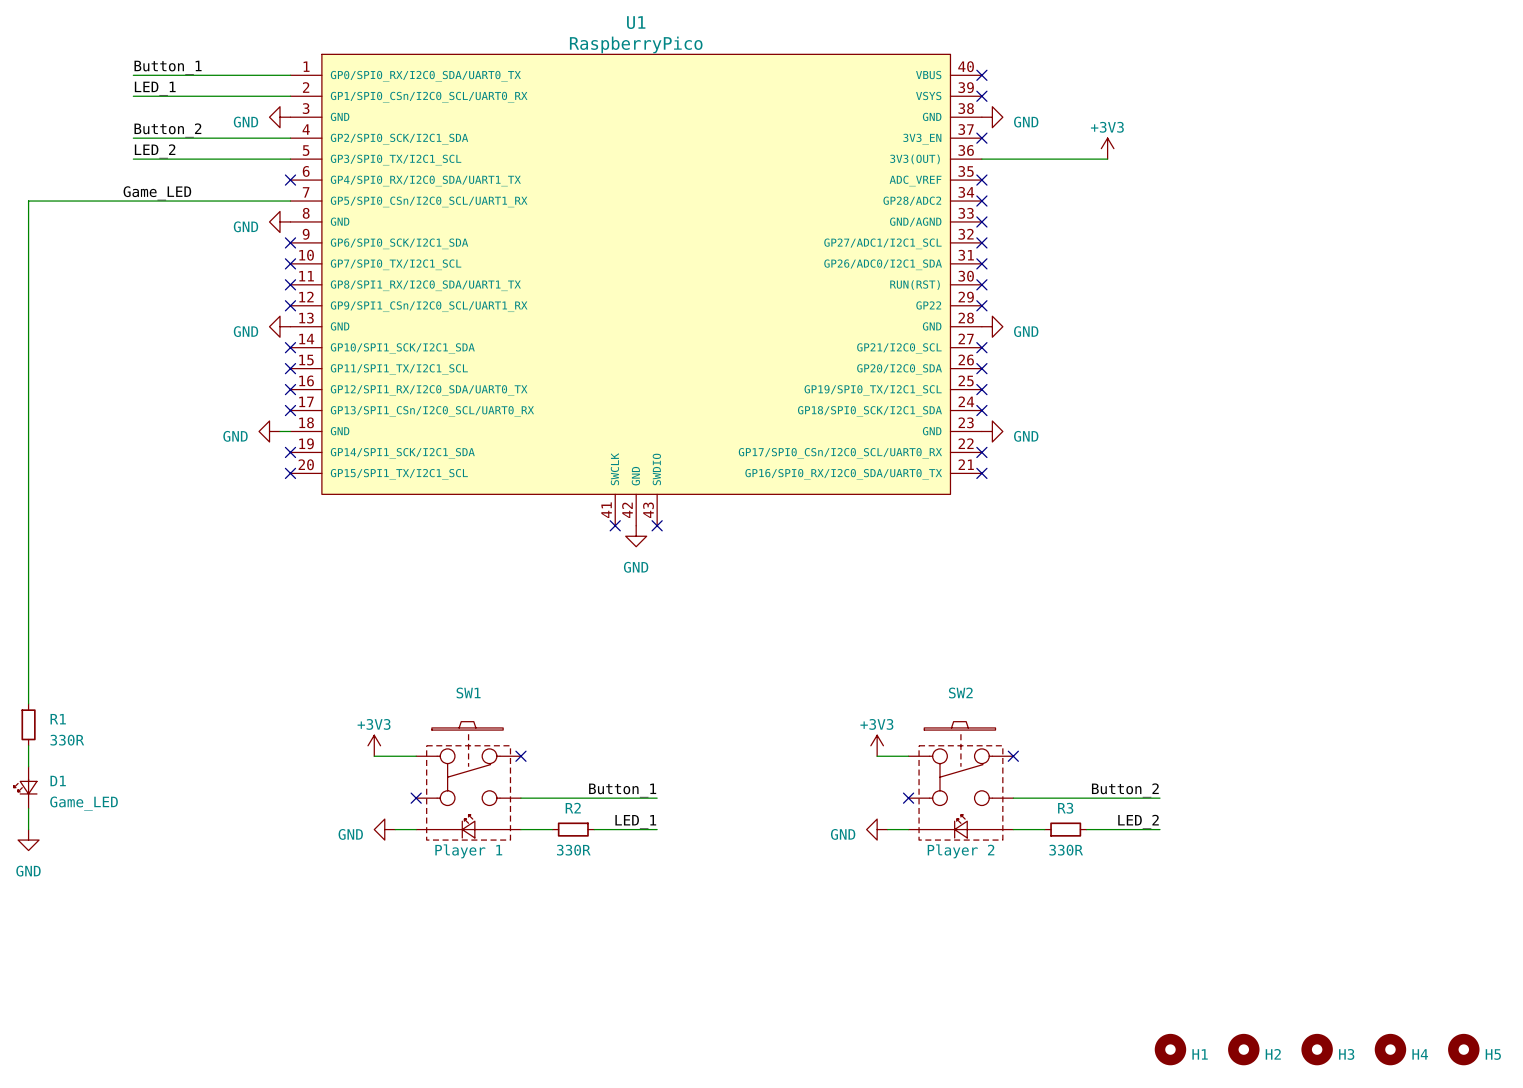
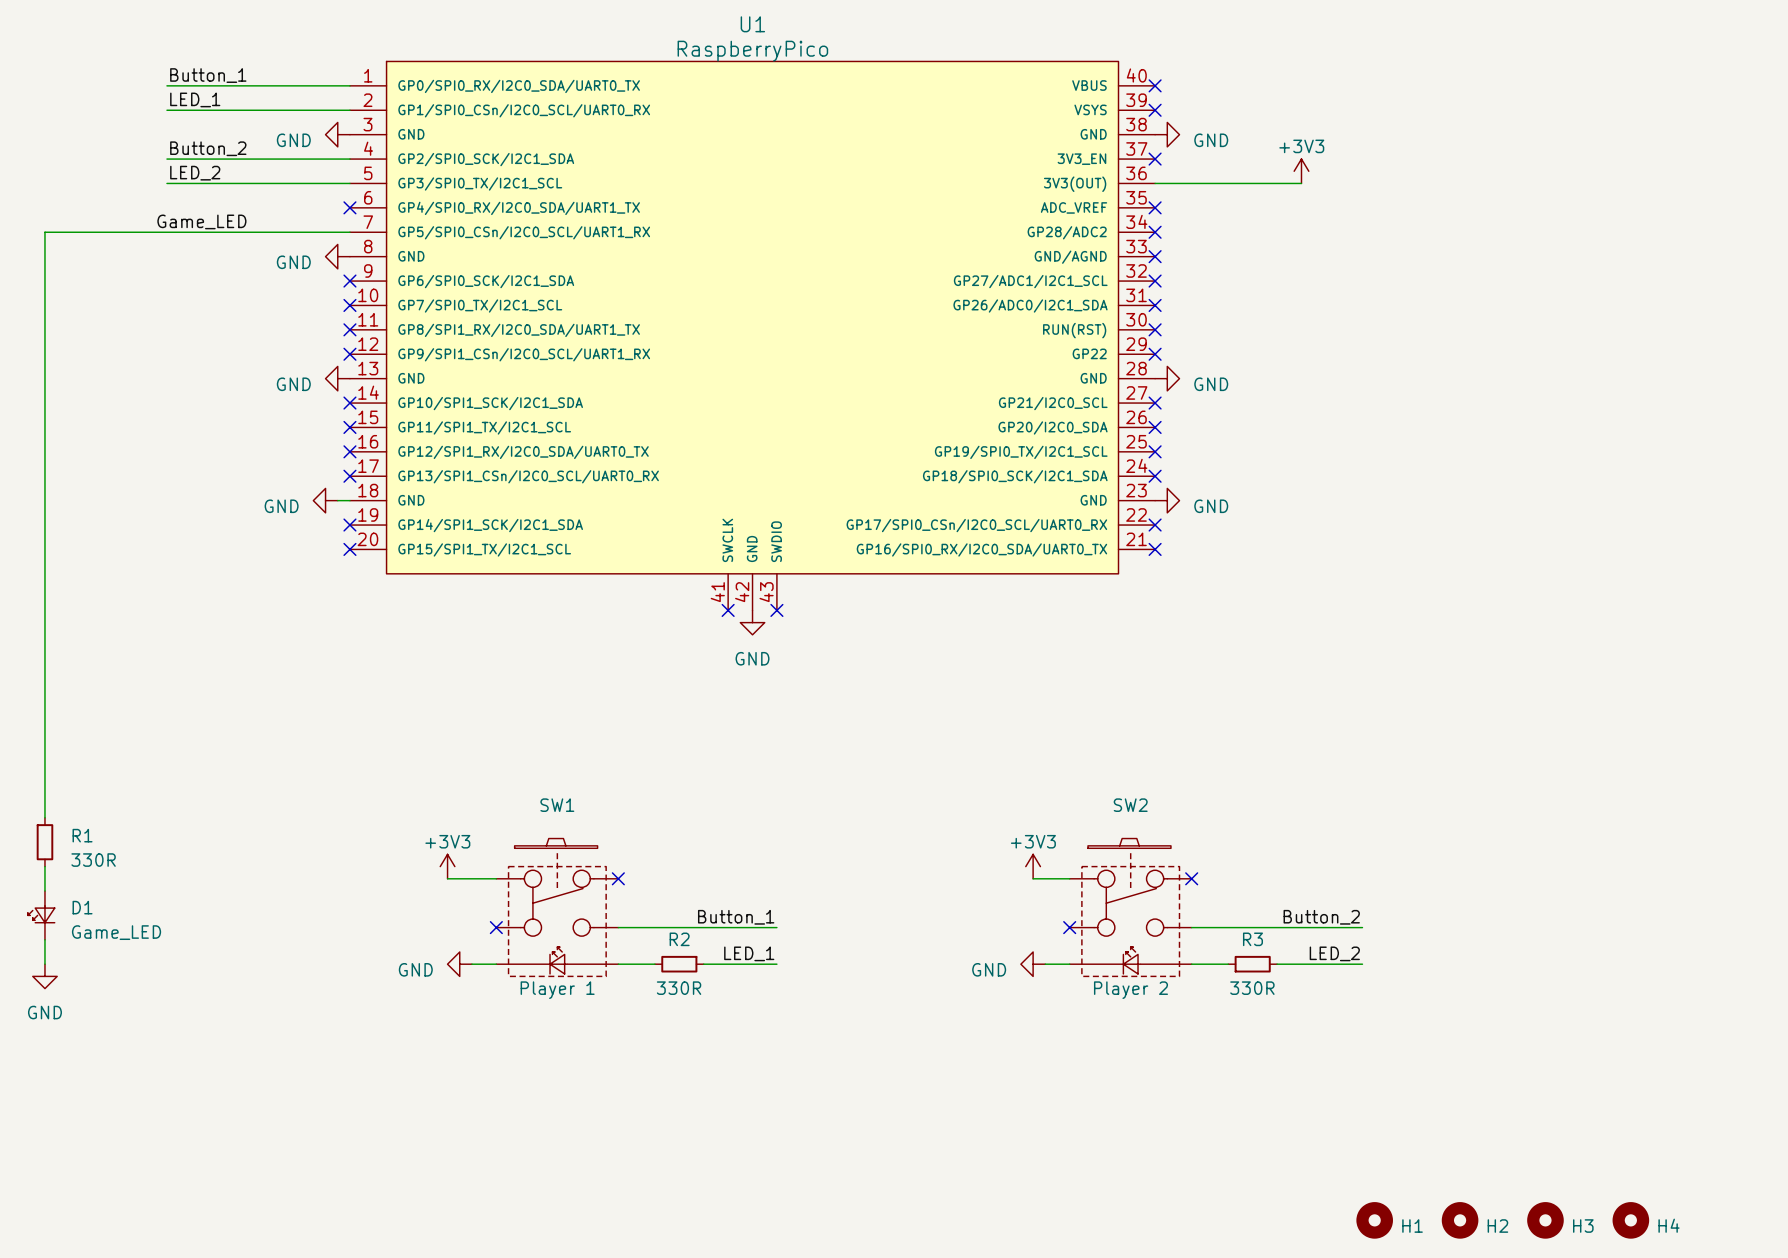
H5: (1463, 1049) -> none

